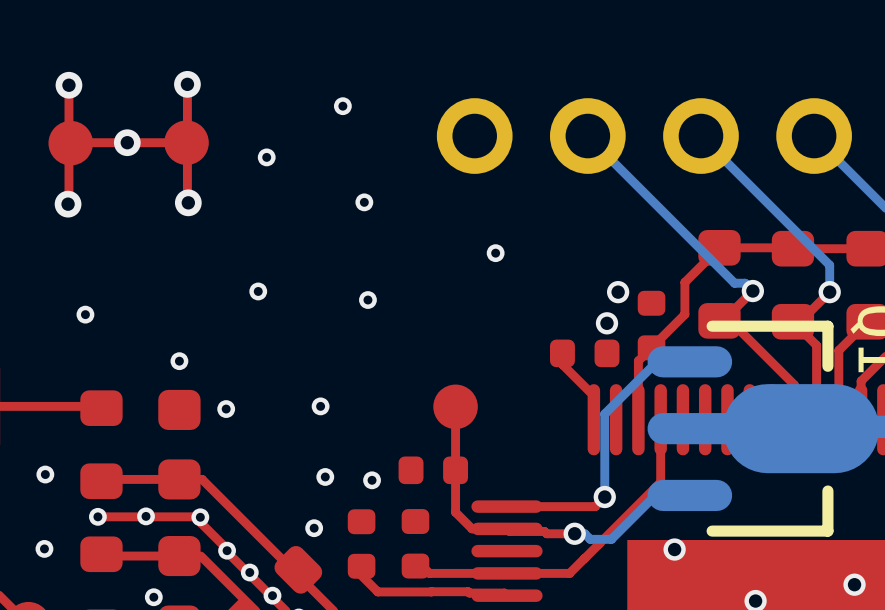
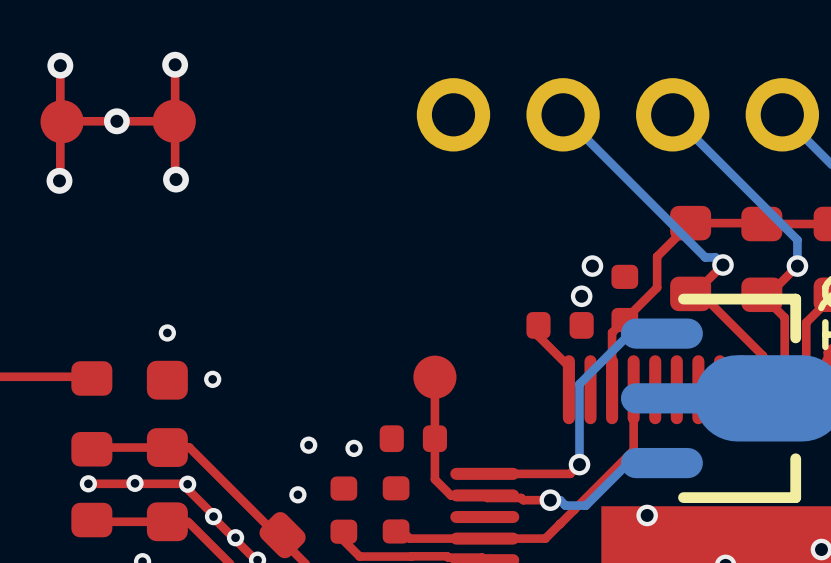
via: (342, 106) -> none
via: (266, 157) -> none
via: (364, 202) -> none
via: (495, 253) -> none
via: (258, 291) -> none
via: (367, 300) -> none
via: (85, 314) -> none
via: (320, 406) -> none
via: (45, 474) -> none
via: (44, 548) -> none

